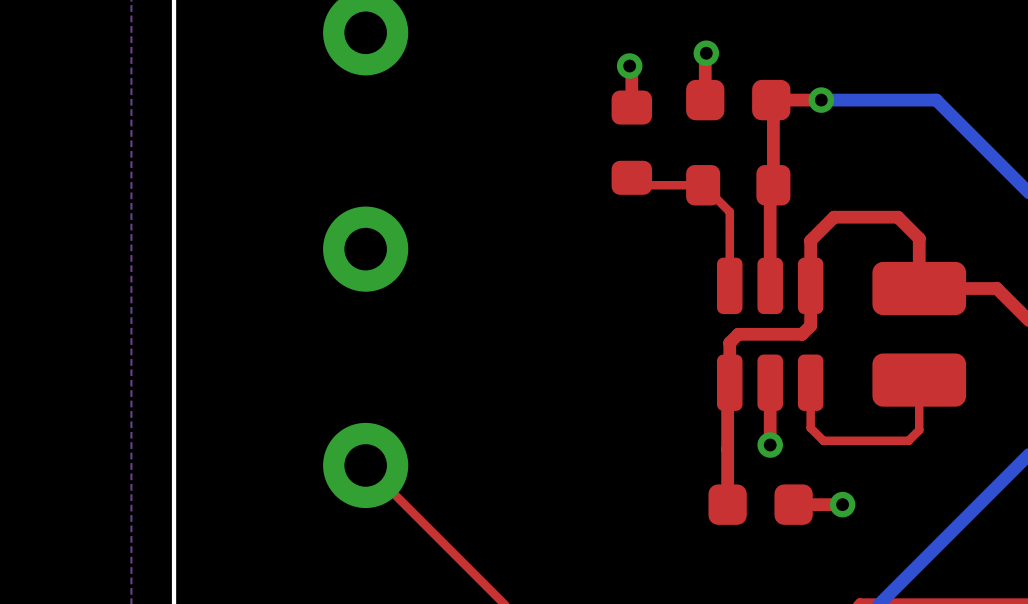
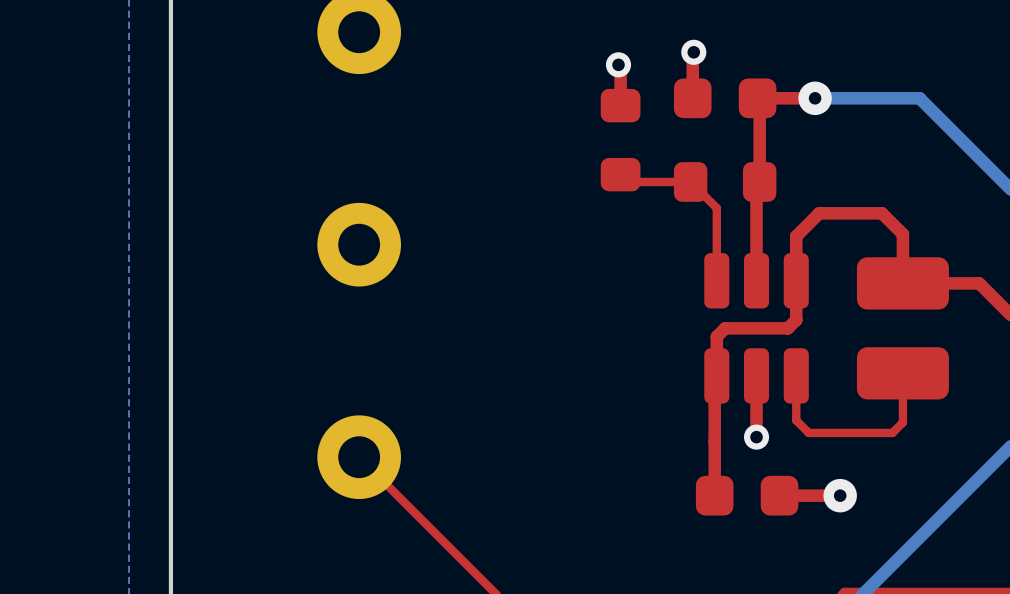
via size: [808, 87, 835, 113] -> [798, 81, 832, 116]
via size: [829, 491, 856, 518] -> [823, 478, 857, 513]

